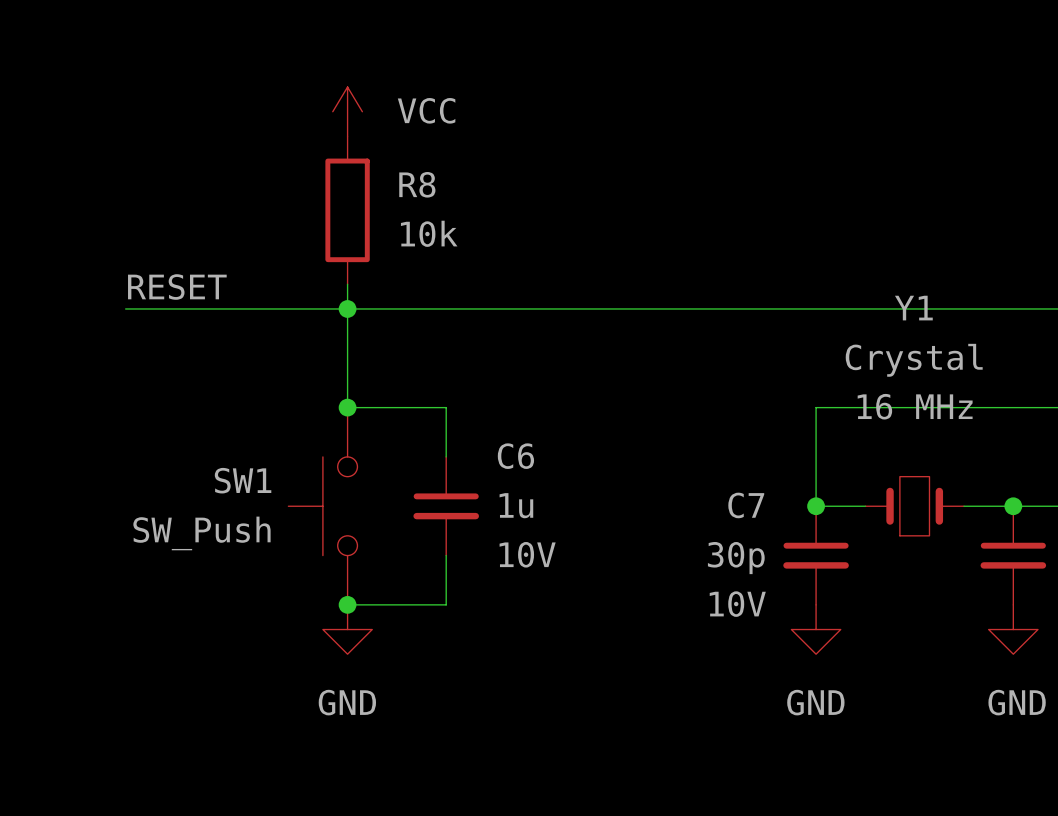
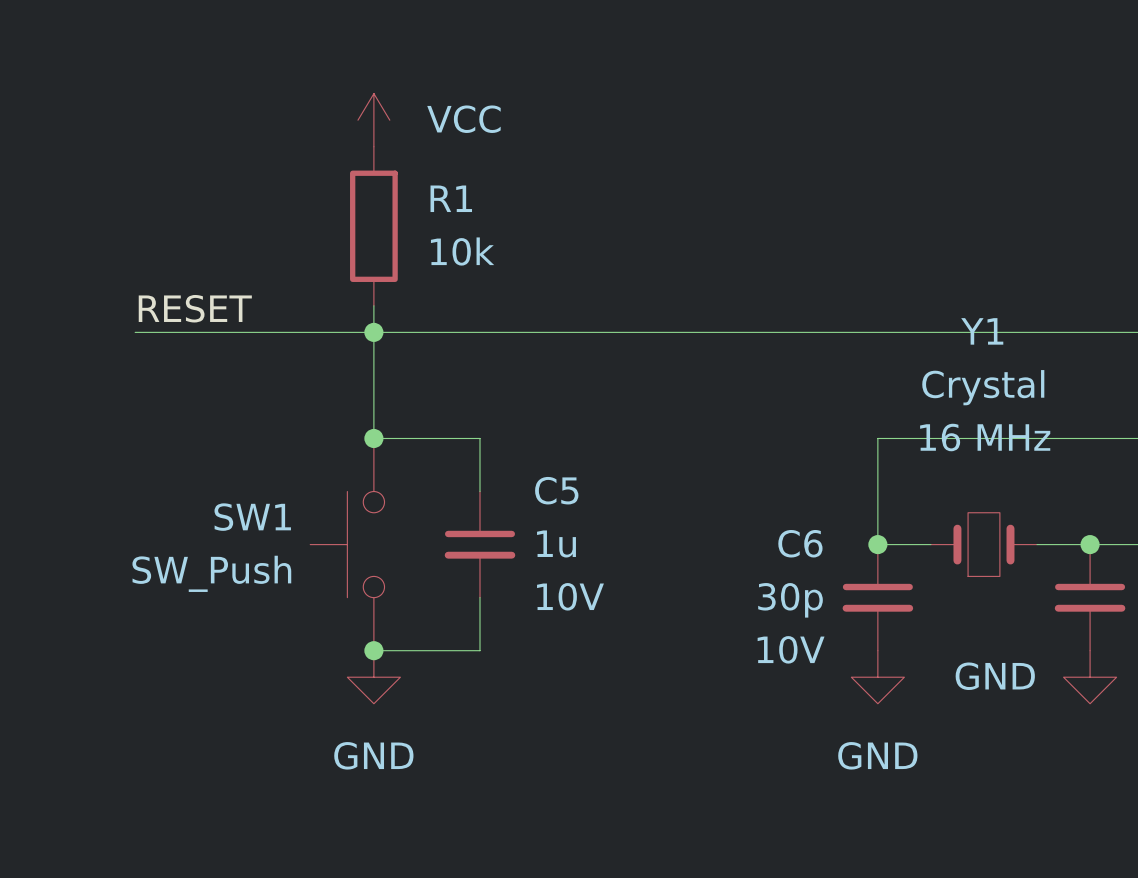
R8 name: R8 (417, 184) -> R1 (451, 198)
C6 name: C6 (515, 456) -> C5 (556, 490)
C7 name: C7 (746, 505) -> C6 (800, 543)
power symbol text position: GND (1017, 702) -> GND (995, 676)

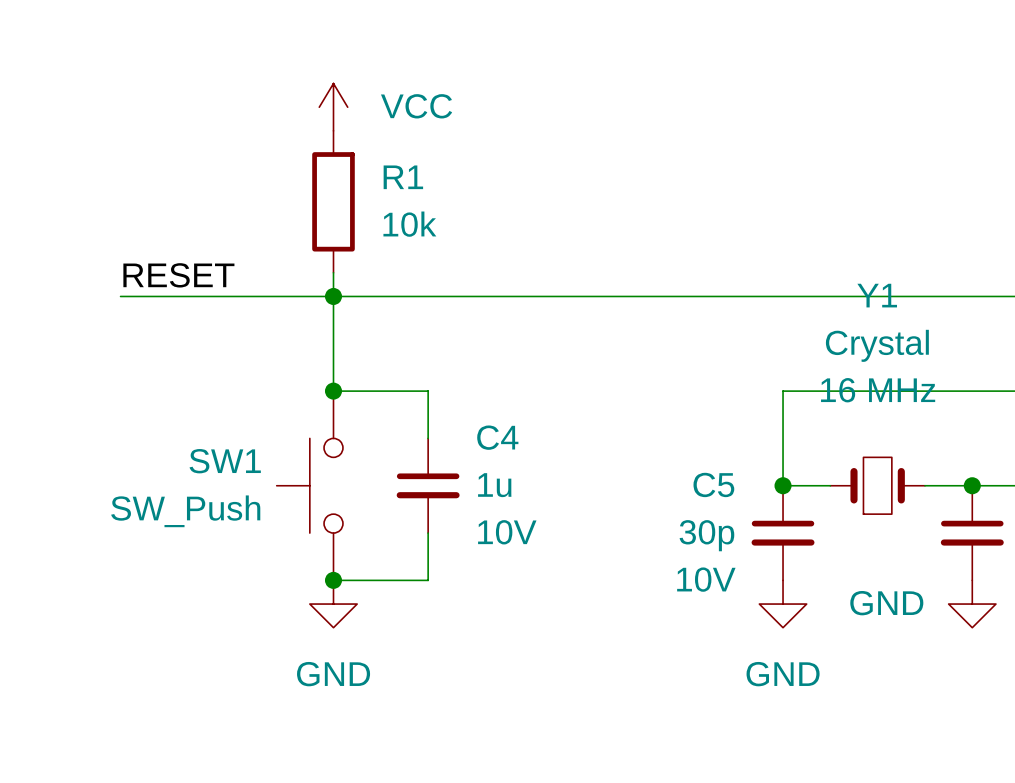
C5 name: C5 (556, 490) -> C4 (497, 437)
C6 name: C6 (800, 543) -> C5 (713, 484)

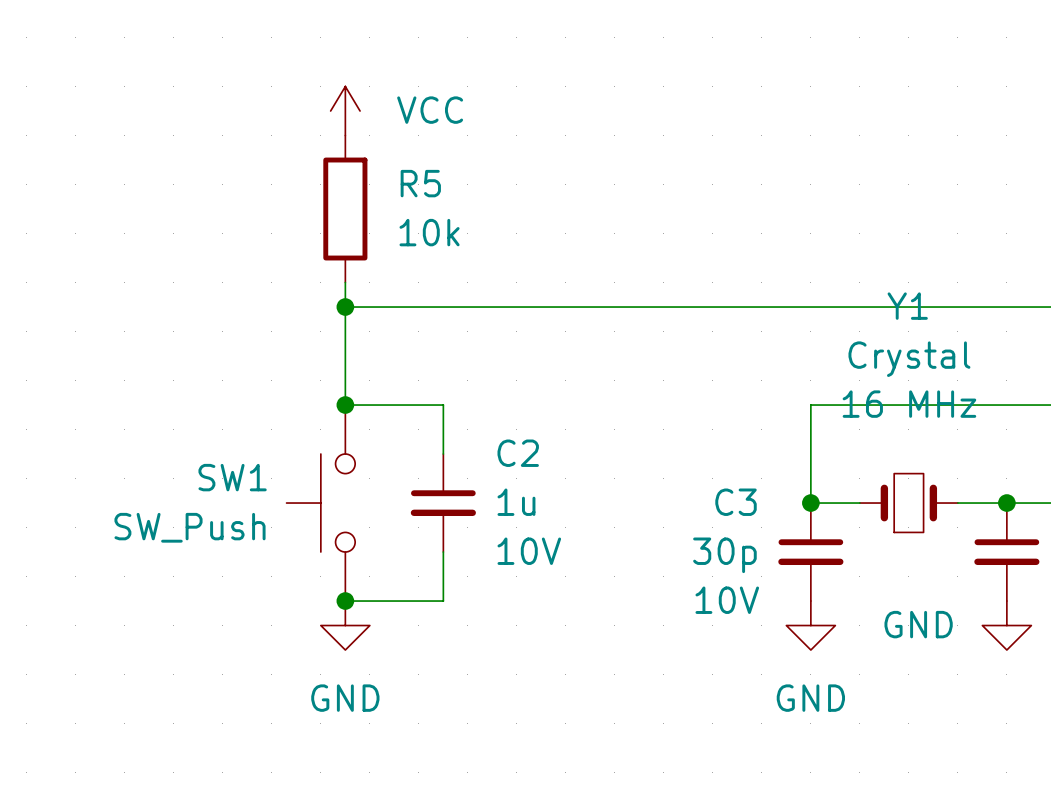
R1 name: R1 (403, 177) -> R5 (420, 183)
label: RESET (178, 275) -> none
wire: (120, 296) (333, 296) -> none
C4 name: C4 (497, 437) -> C2 (518, 453)
C5 name: C5 (713, 484) -> C3 (736, 502)

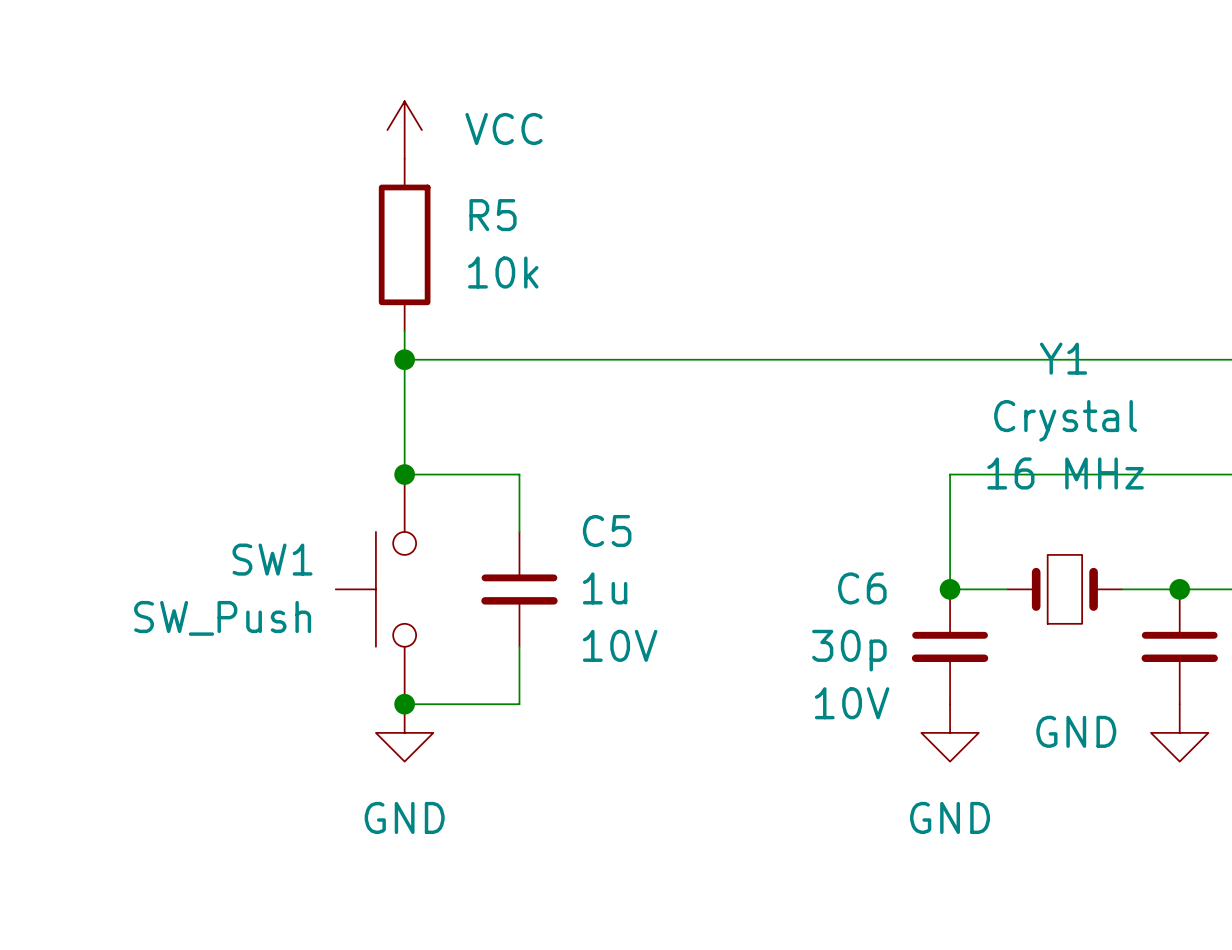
C2 name: C2 (518, 453) -> C5 (607, 531)
C3 name: C3 (736, 502) -> C6 (862, 588)

